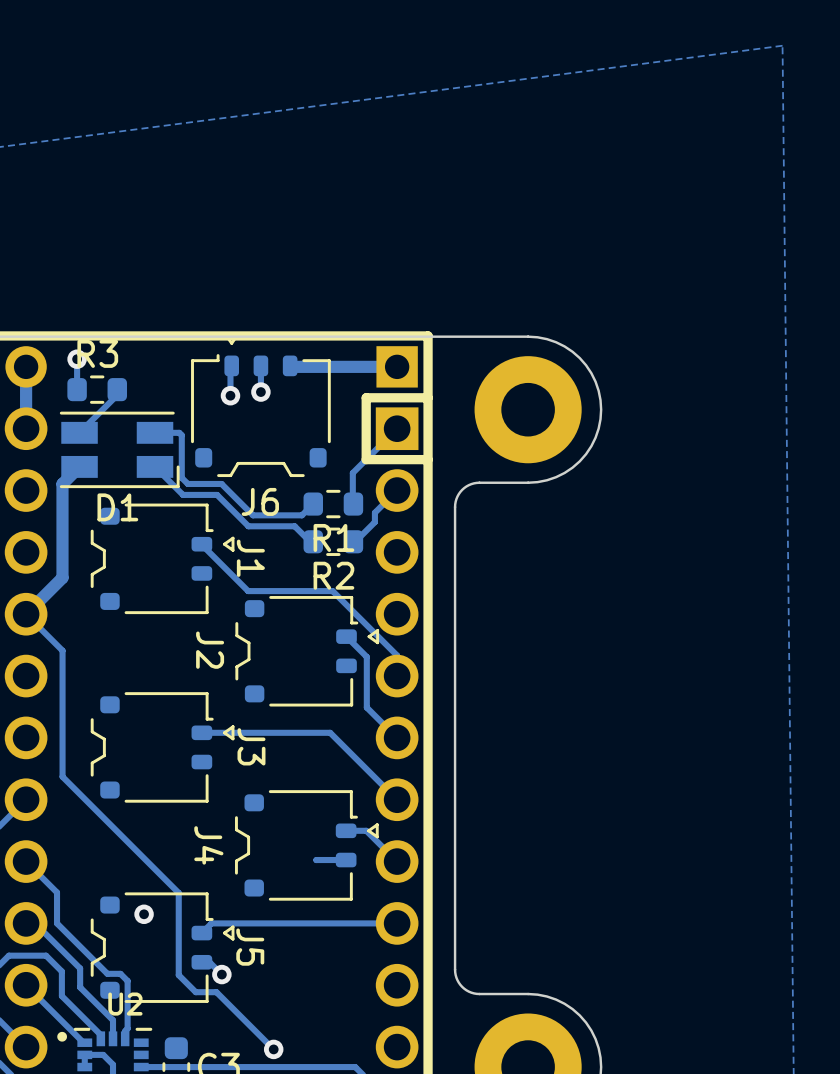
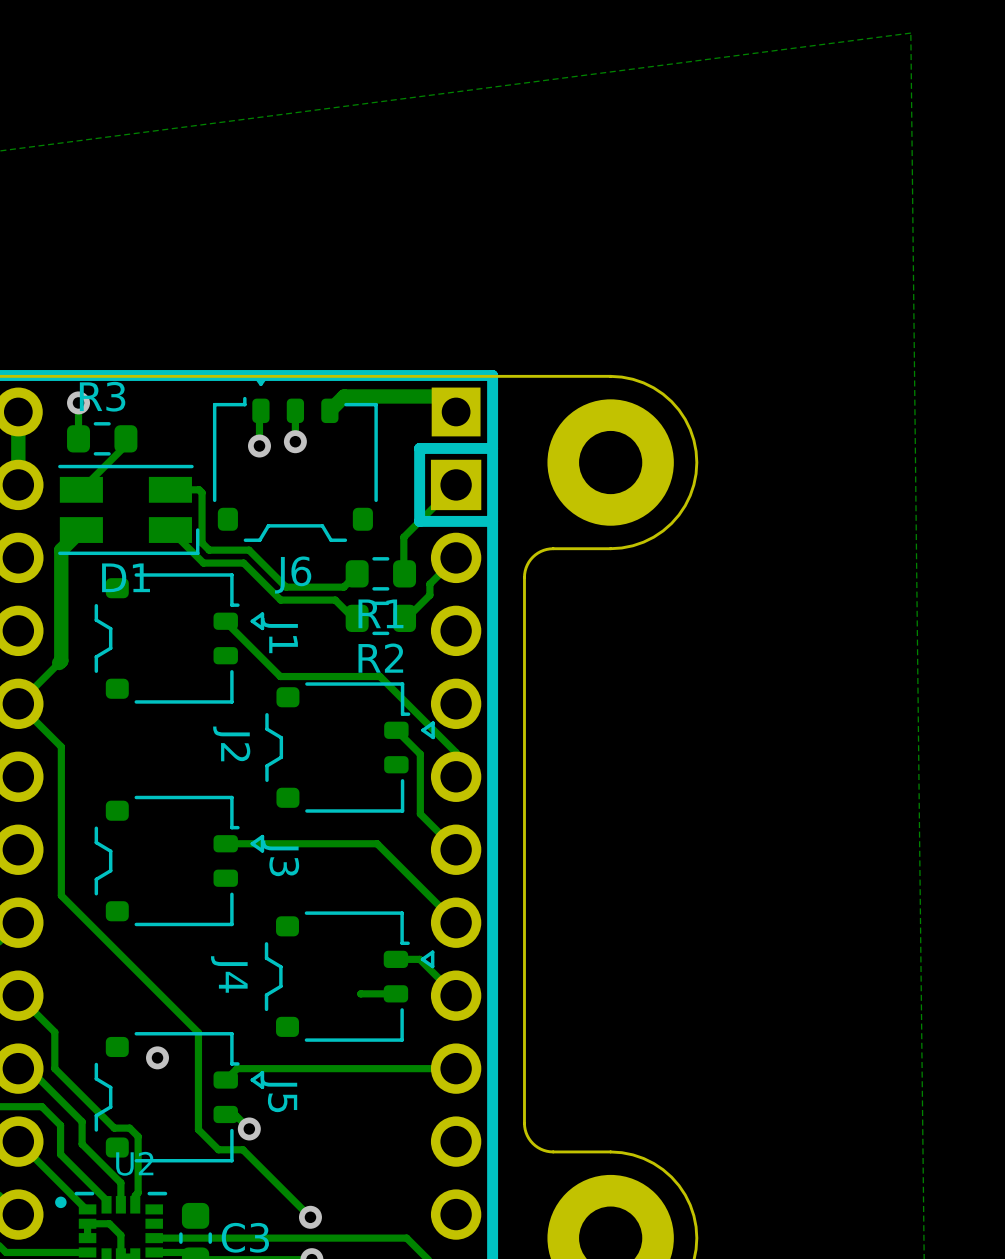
track: (290, 365) (397, 366) -> (329, 410) (344, 396) (440, 396) (456, 411)
track width: thick (60, 579) (26, 614) -> thin (59, 663) (18, 703)

